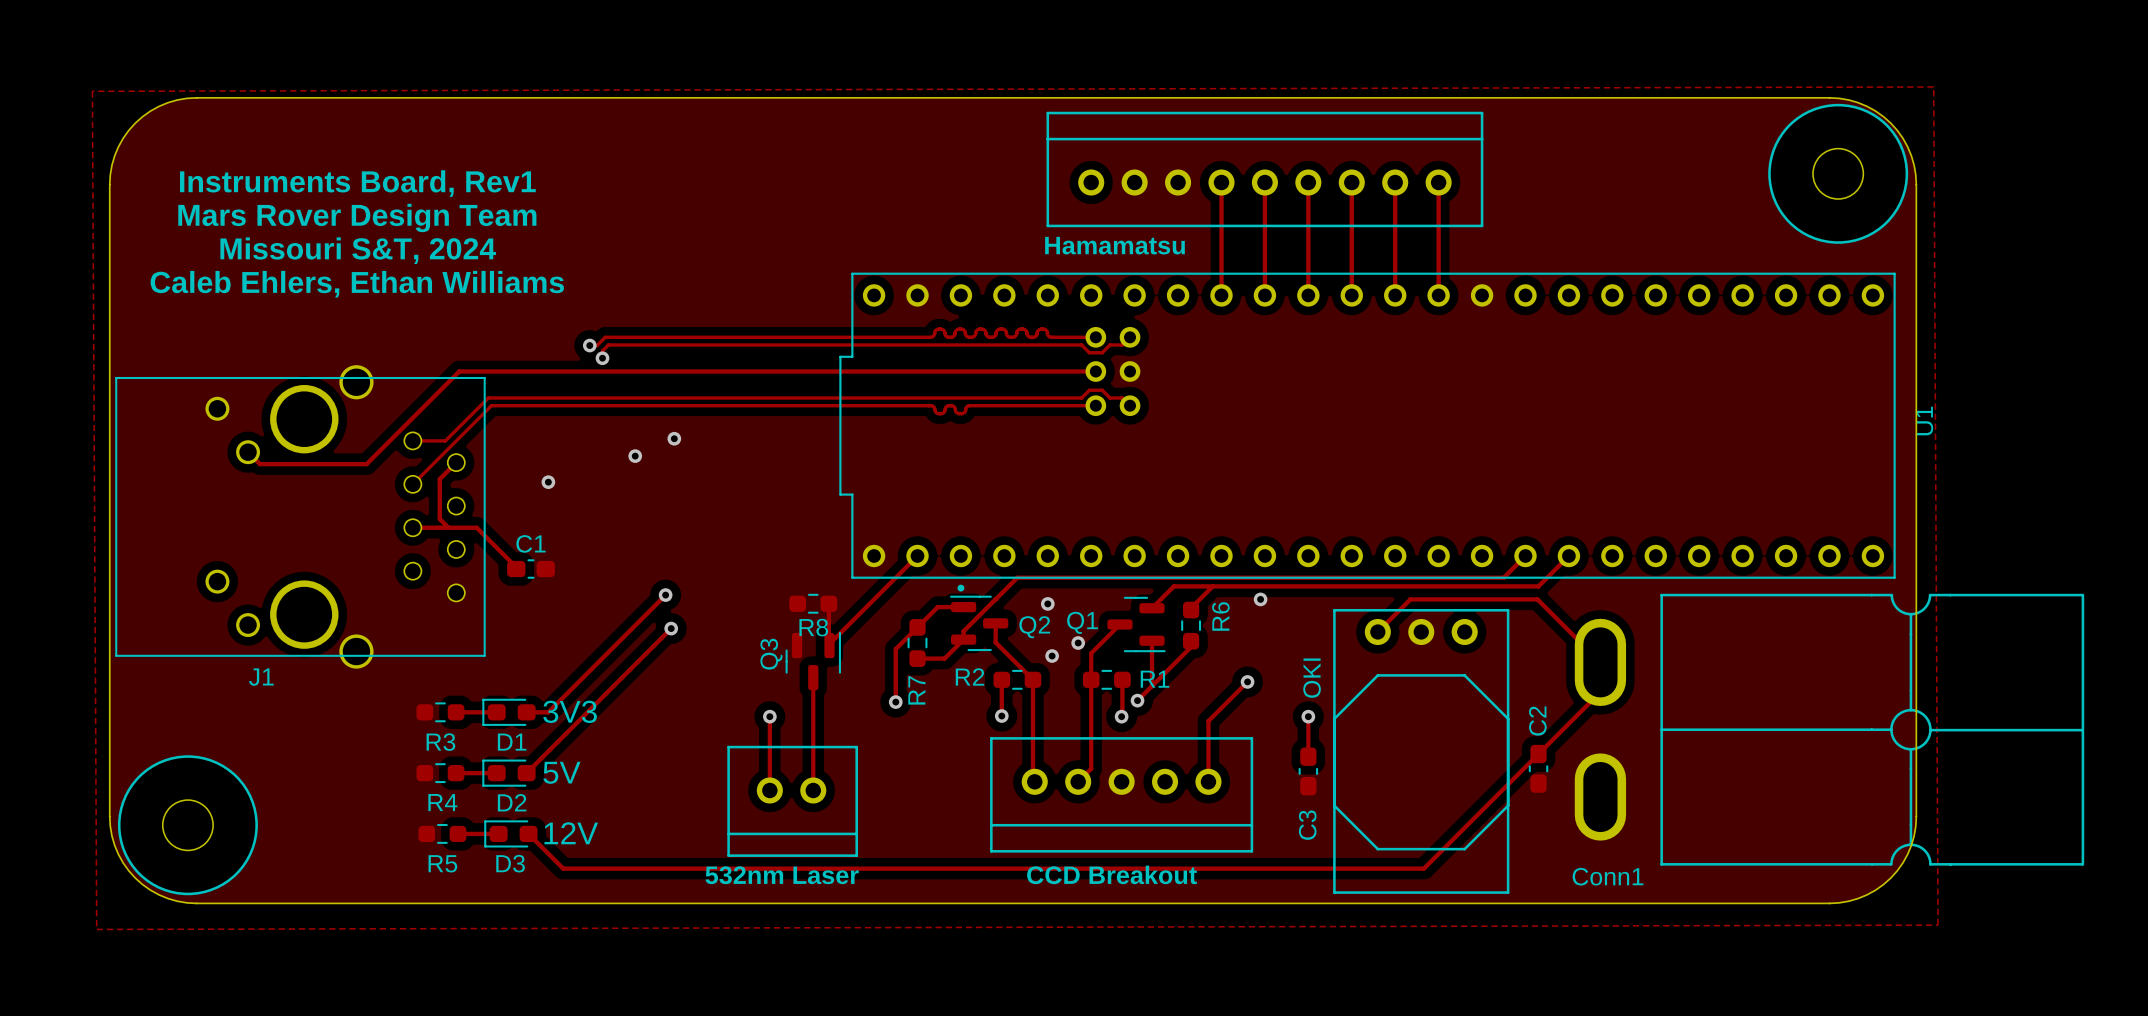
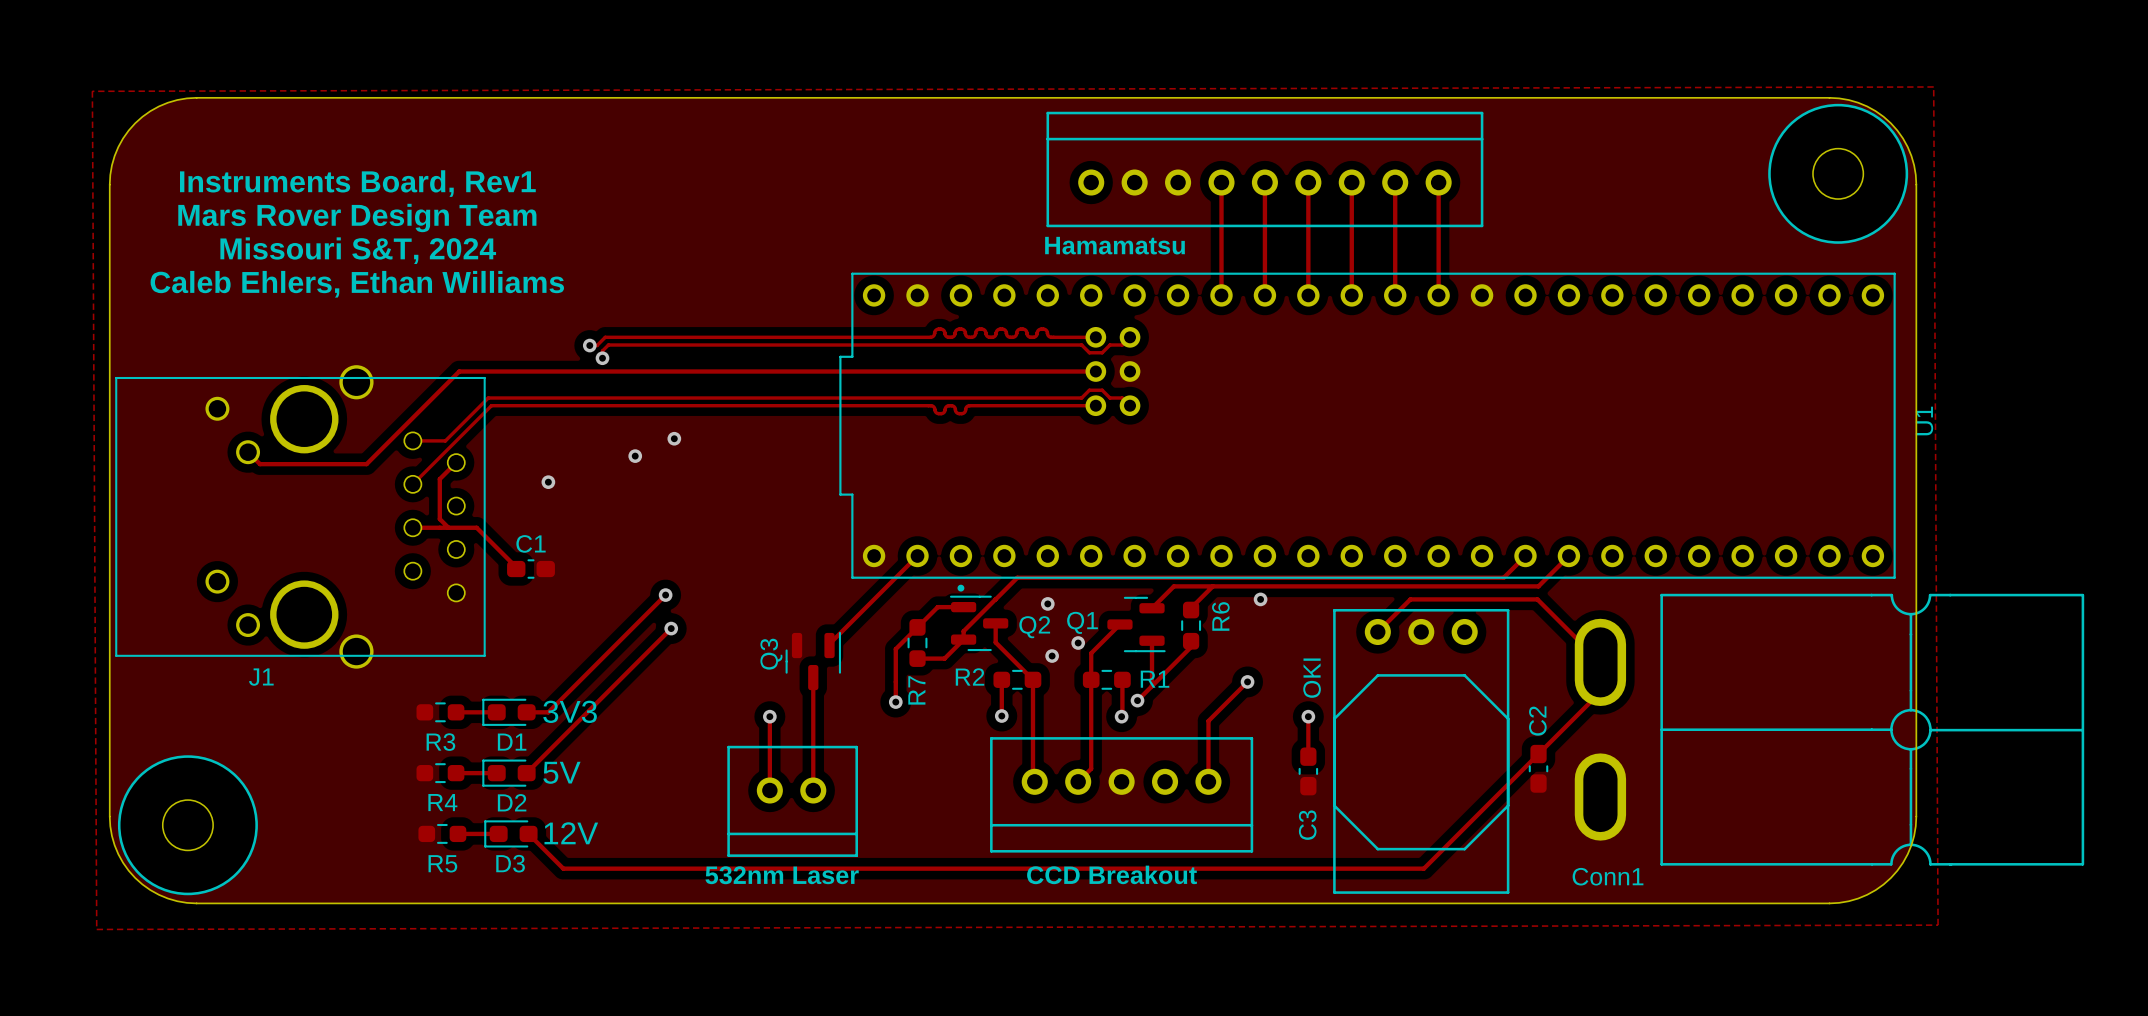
R8: (813, 603) -> none
track: (828, 603) (829, 645) -> none

